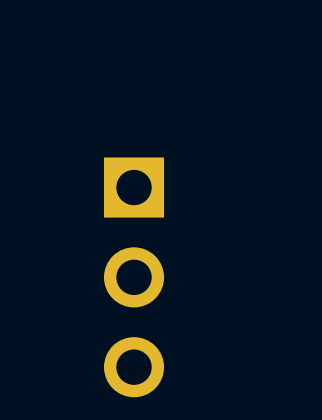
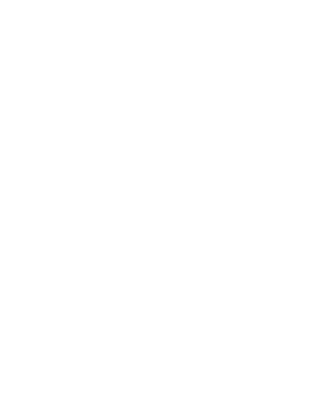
part: (134, 277) -> none

